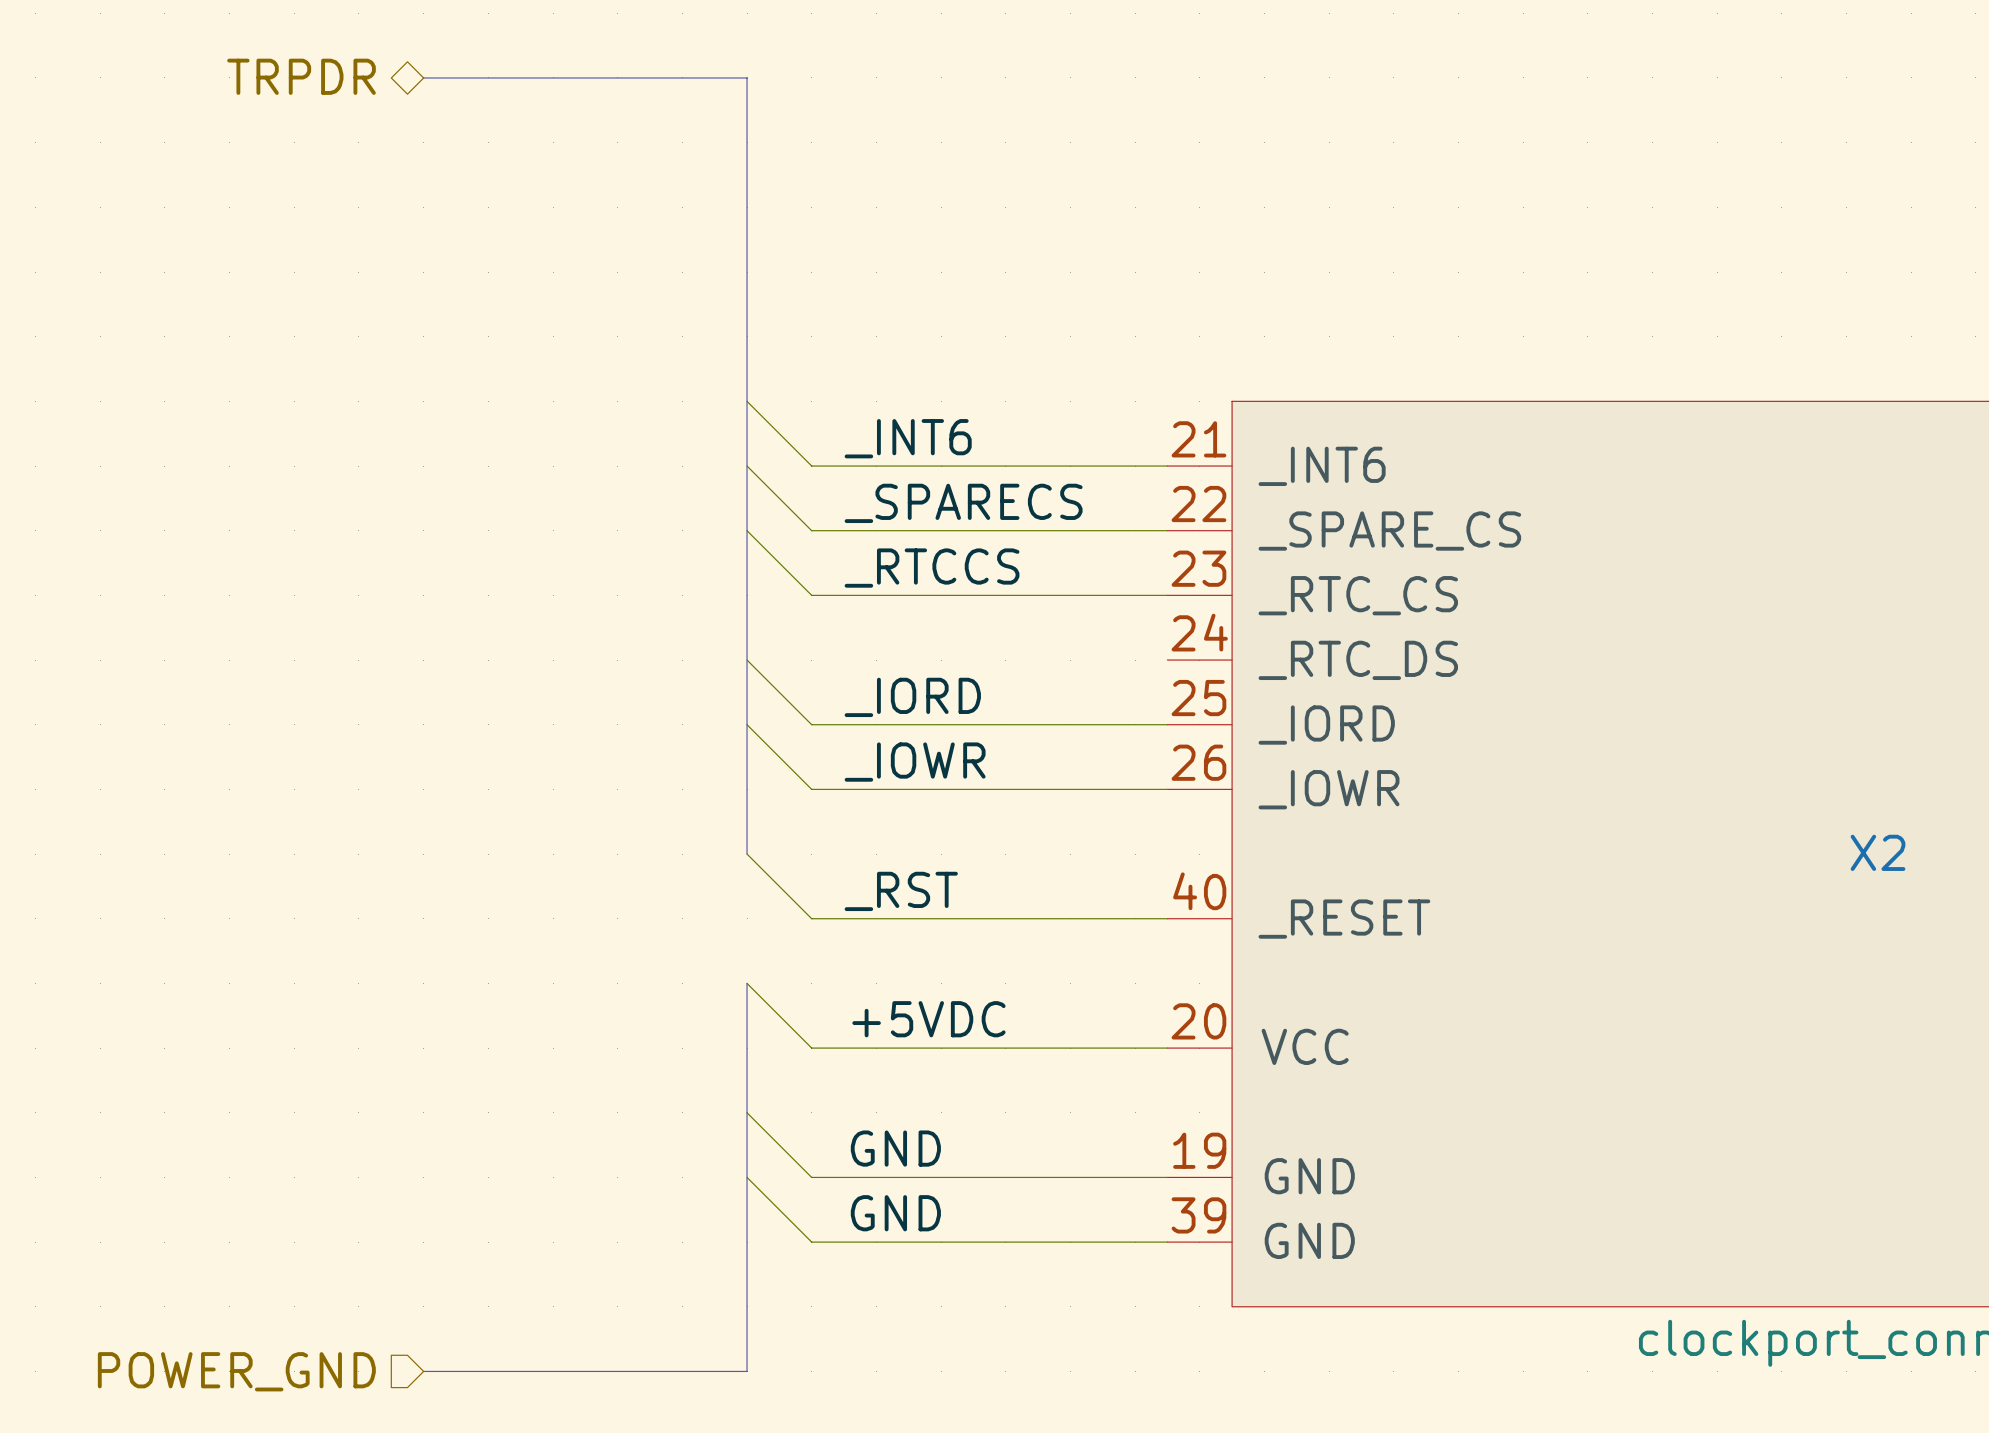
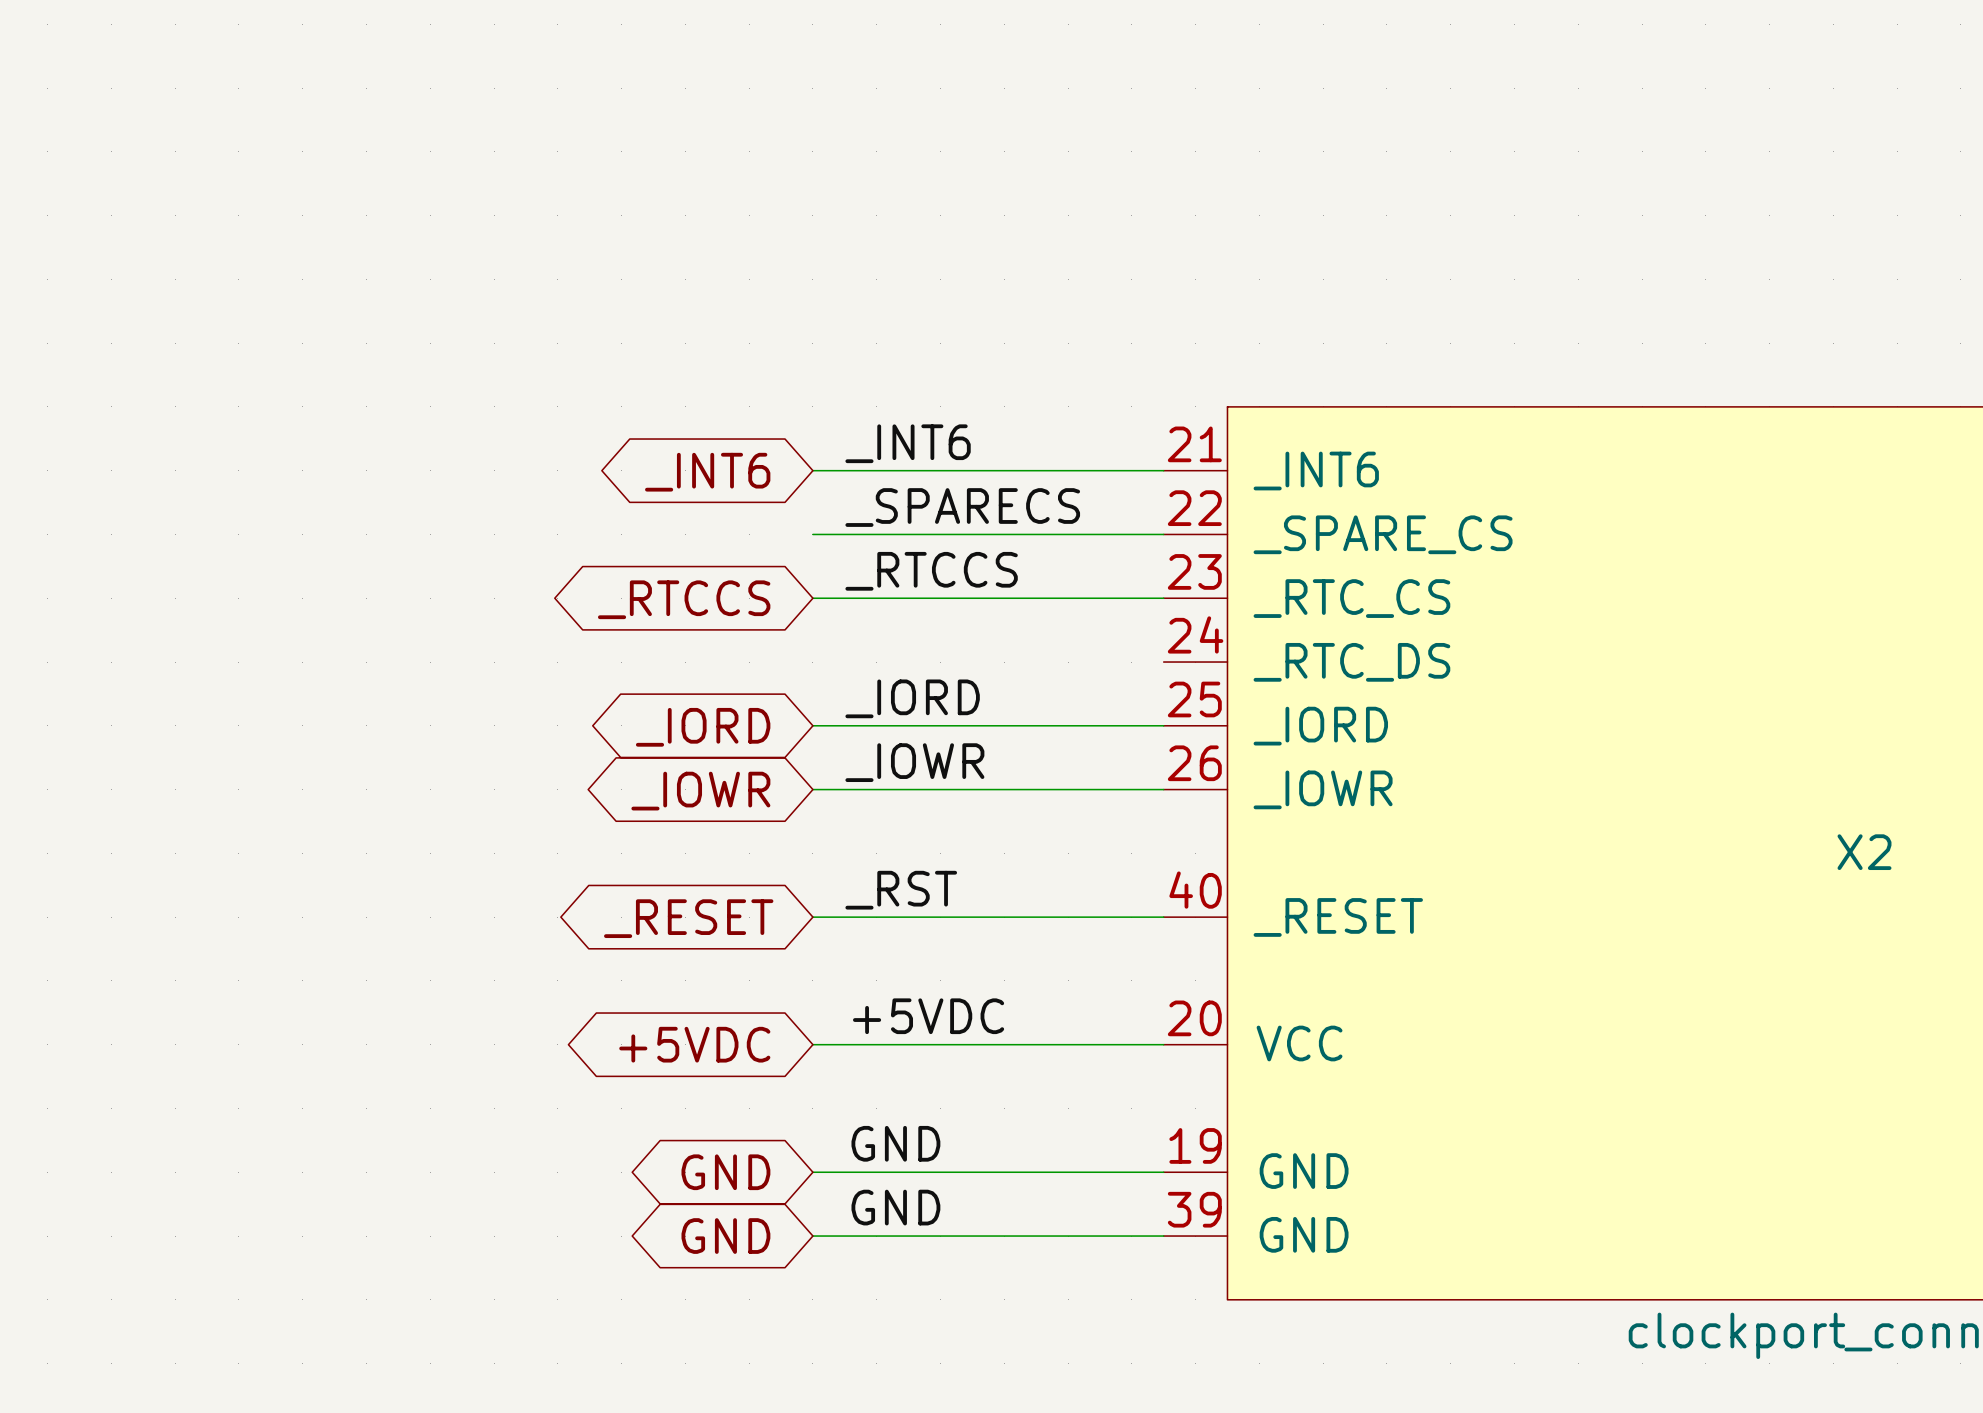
hierarchical label: TRPDR (301, 76) -> none
bus: (423, 77) (747, 77) (747, 854) -> none
wire: (747, 401) (811, 466) -> none
wire: (747, 466) (811, 530) -> none
global label: none -> _INT6 (707, 472)
wire: (747, 530) (811, 595) -> none
global label: none -> _RTCCS (684, 599)
wire: (747, 660) (811, 724) -> none
wire: (747, 724) (811, 789) -> none
global label: none -> _IORD (703, 727)
global label: none -> _IOWR (700, 791)
wire: (747, 854) (811, 918) -> none
global label: none -> _RESET (688, 918)
wire: (747, 983) (811, 1048) -> none
bus: (747, 983) (747, 1371) (423, 1371) -> none
global label: none -> +5VDC (694, 1044)
wire: (747, 1112) (811, 1177) -> none
global label: none -> GND (725, 1172)
wire: (747, 1177) (811, 1242) -> none
global label: none -> GND (725, 1236)
hierarchical label: POWER_GND (236, 1371) -> none

